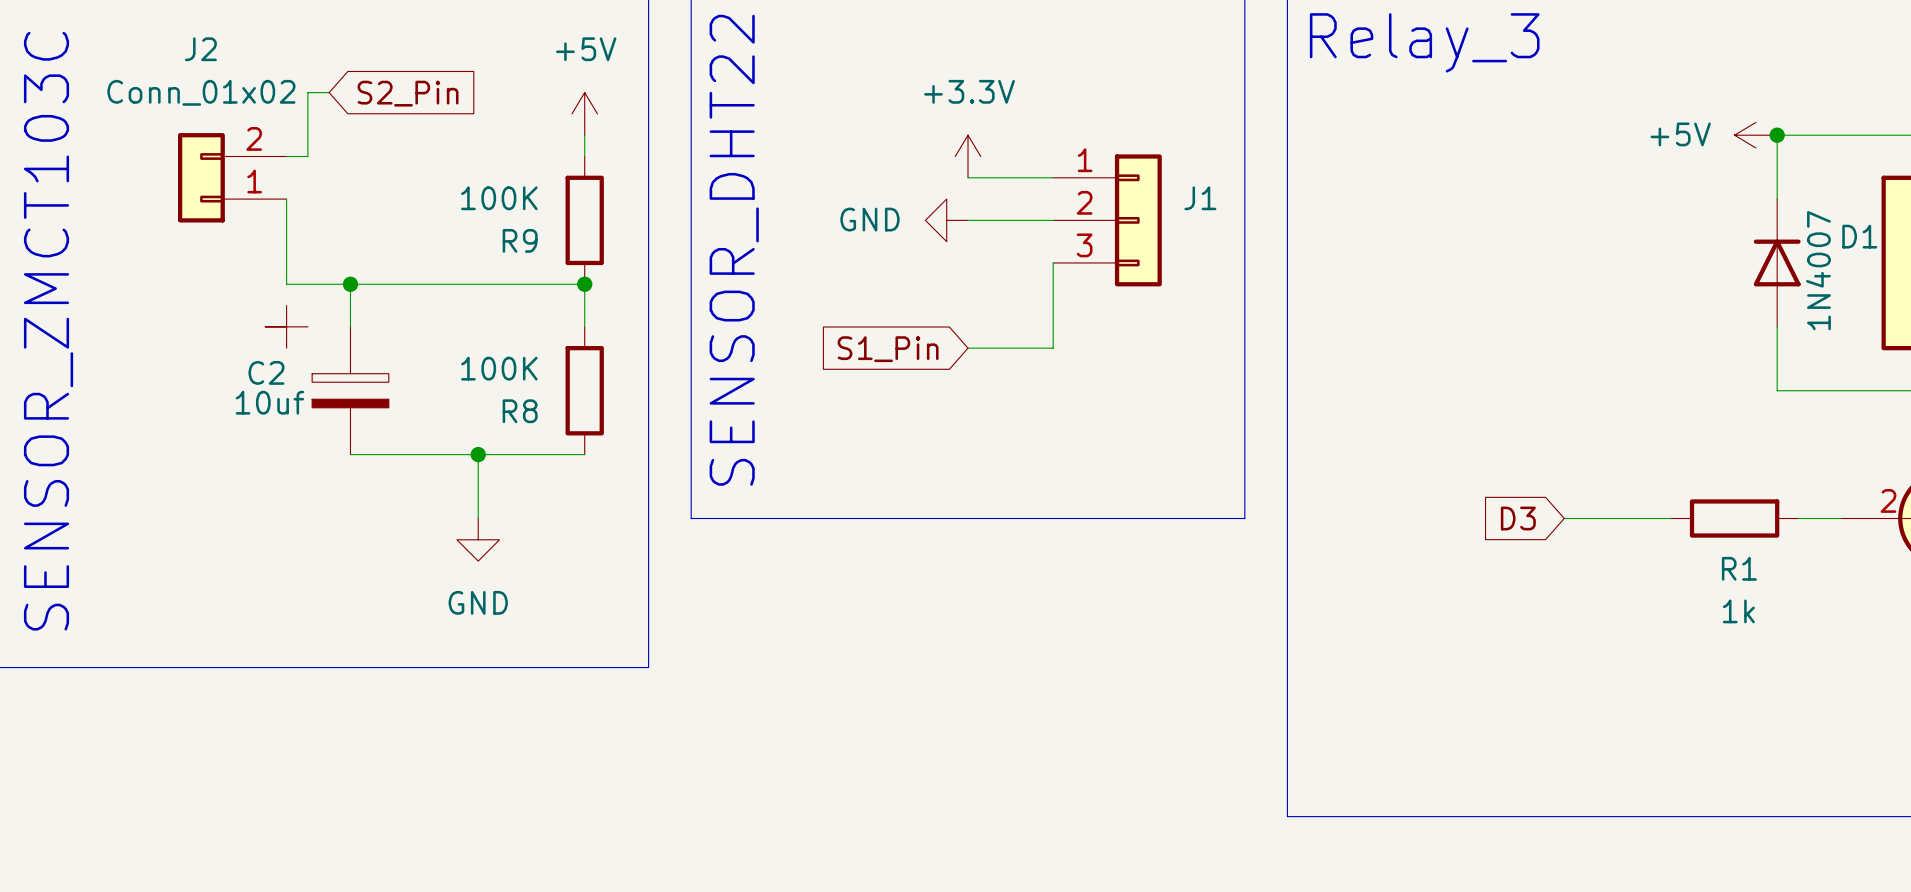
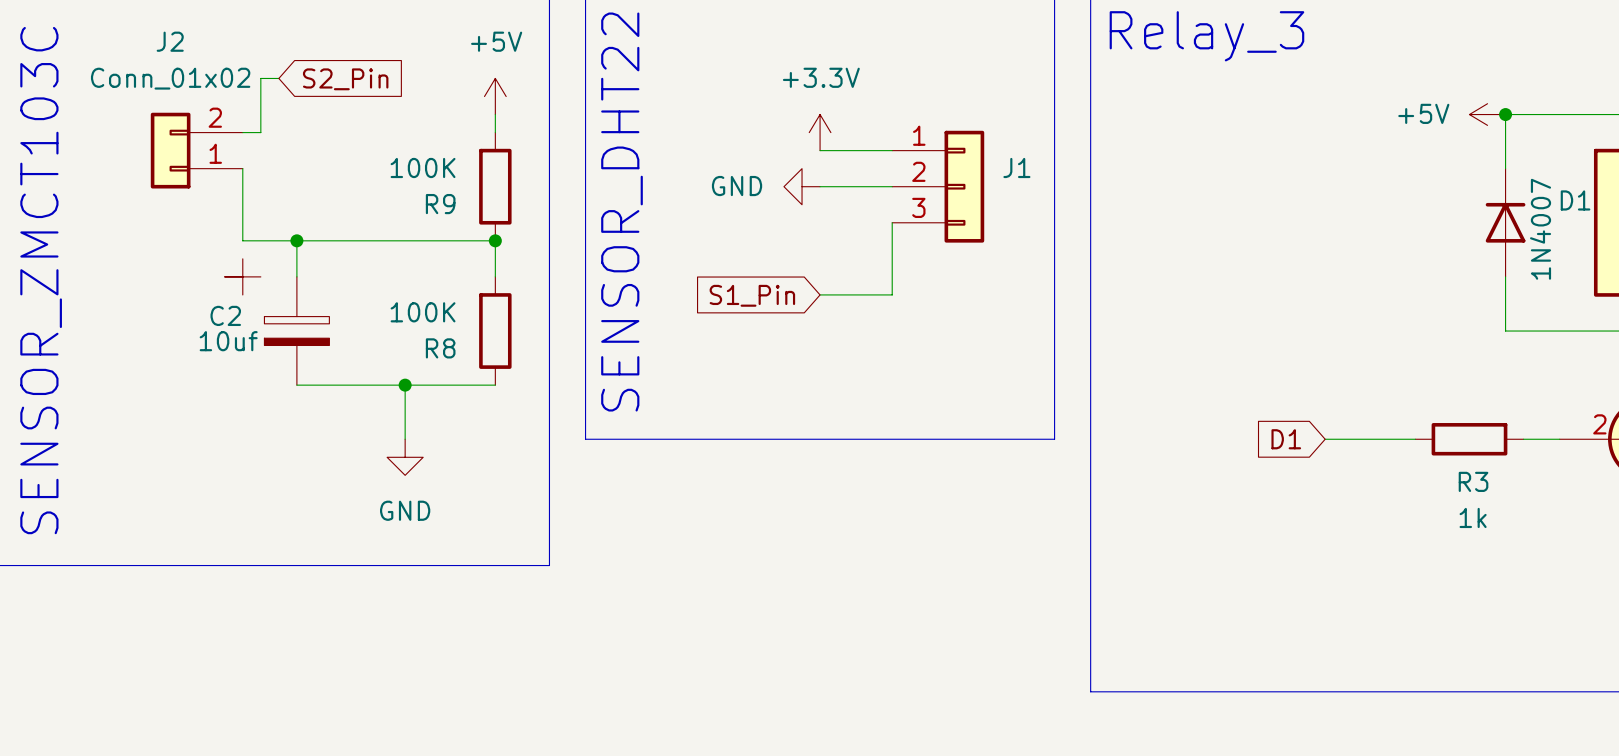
global label: D3 (1518, 518) -> D1 (1286, 439)
R1 name: R1 (1739, 568) -> R3 (1473, 481)

